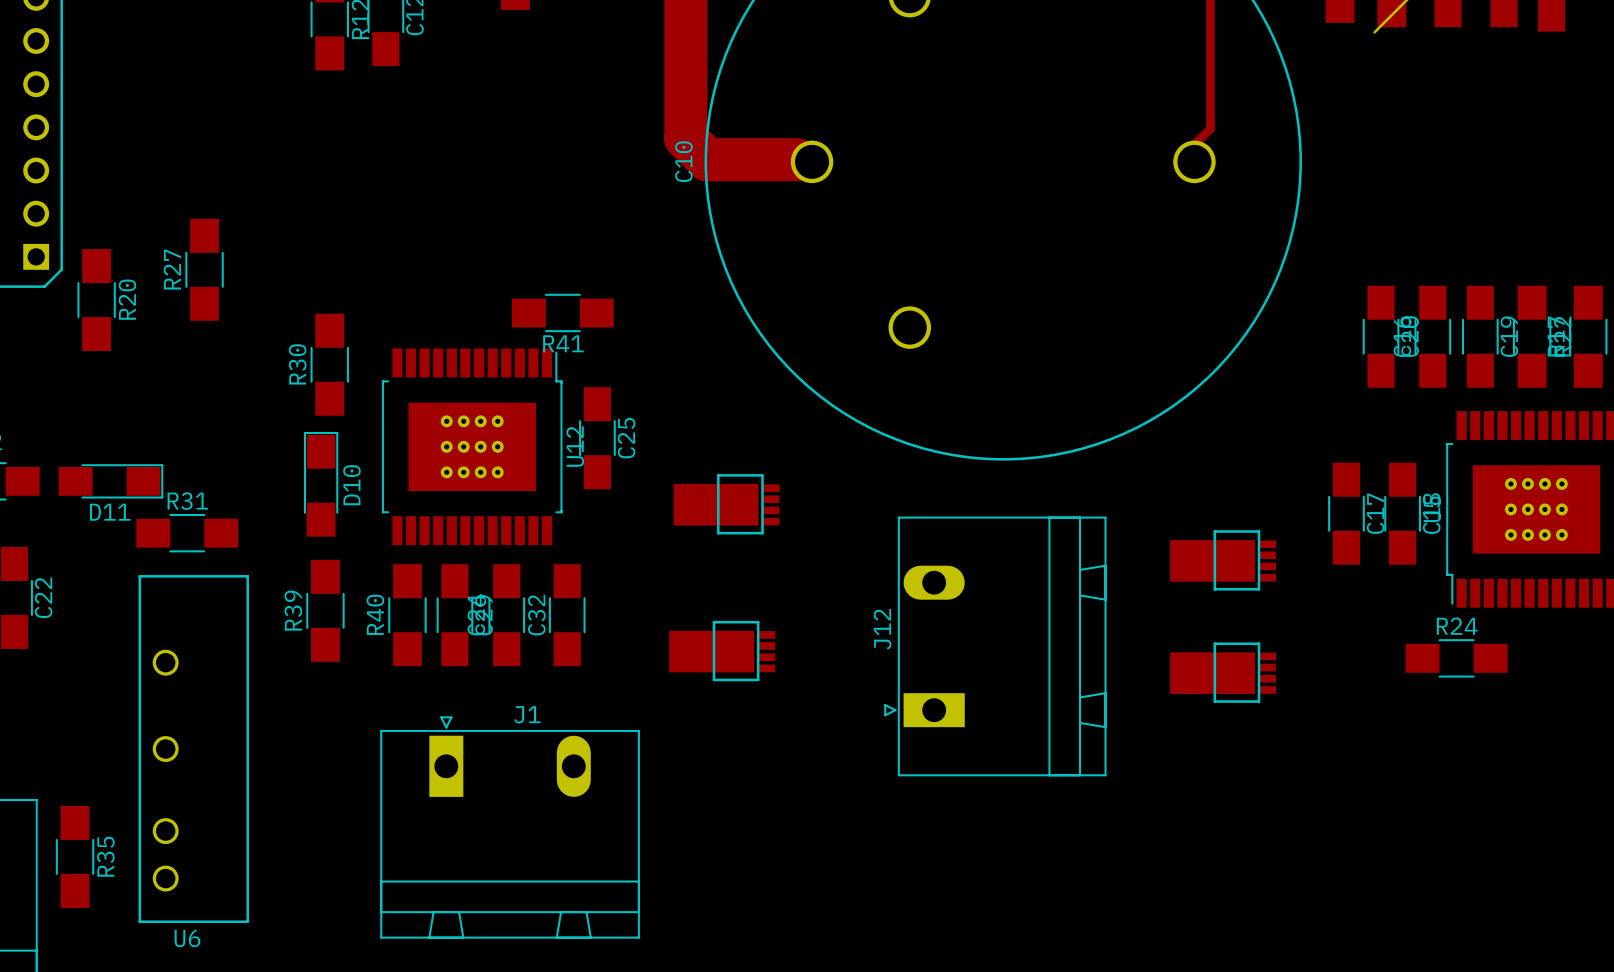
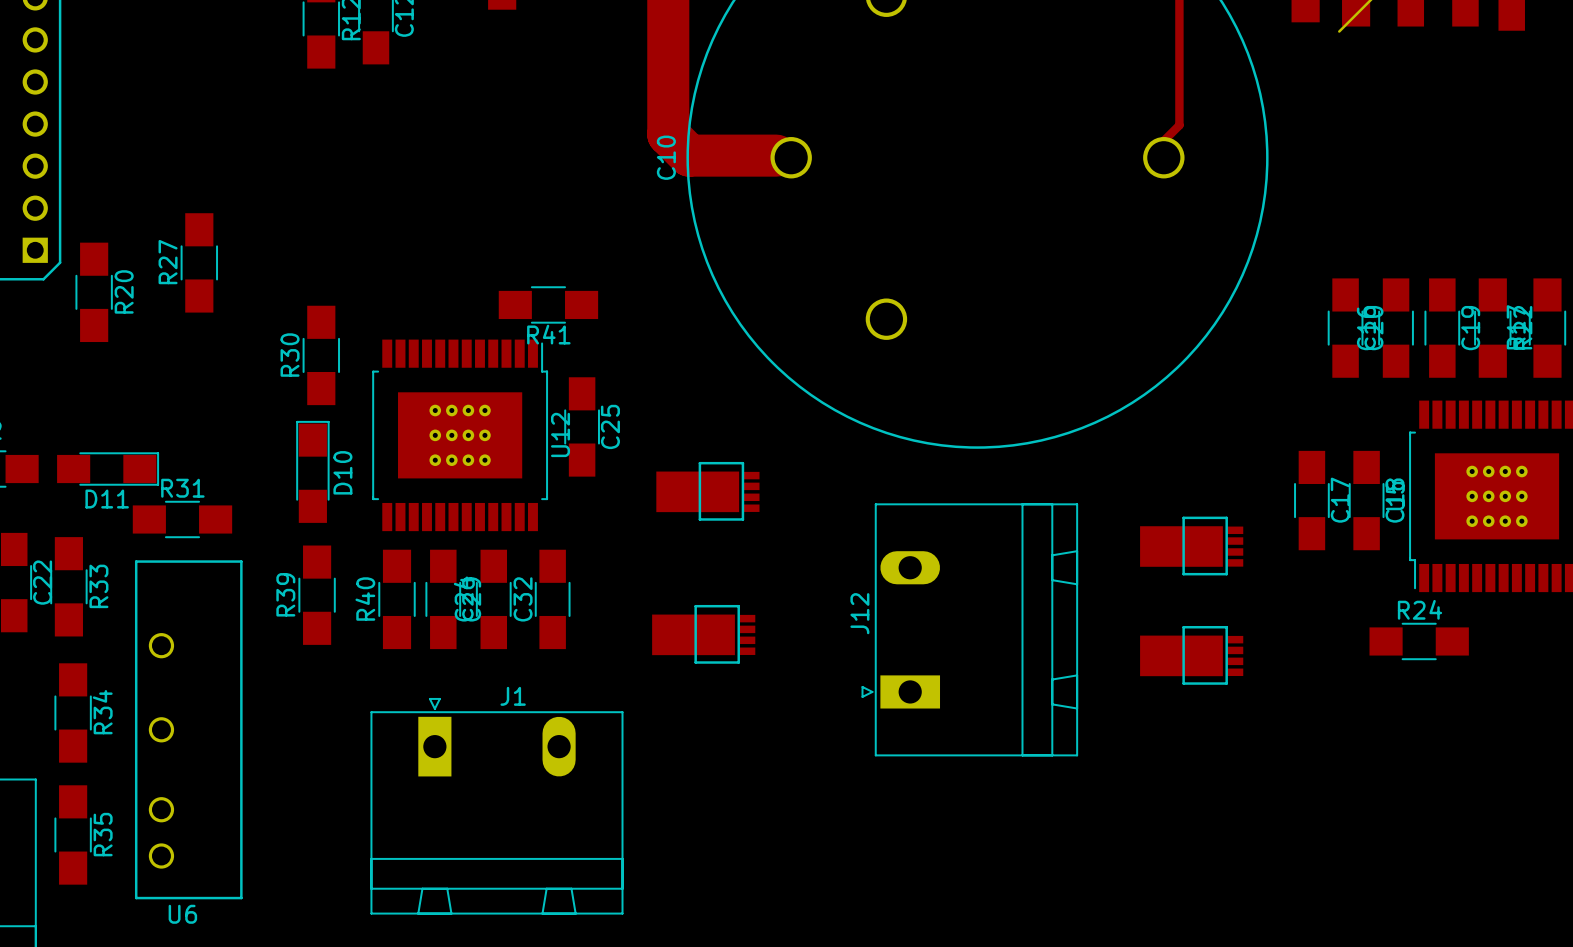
R33: none -> (68, 586)
R34: none -> (73, 712)

